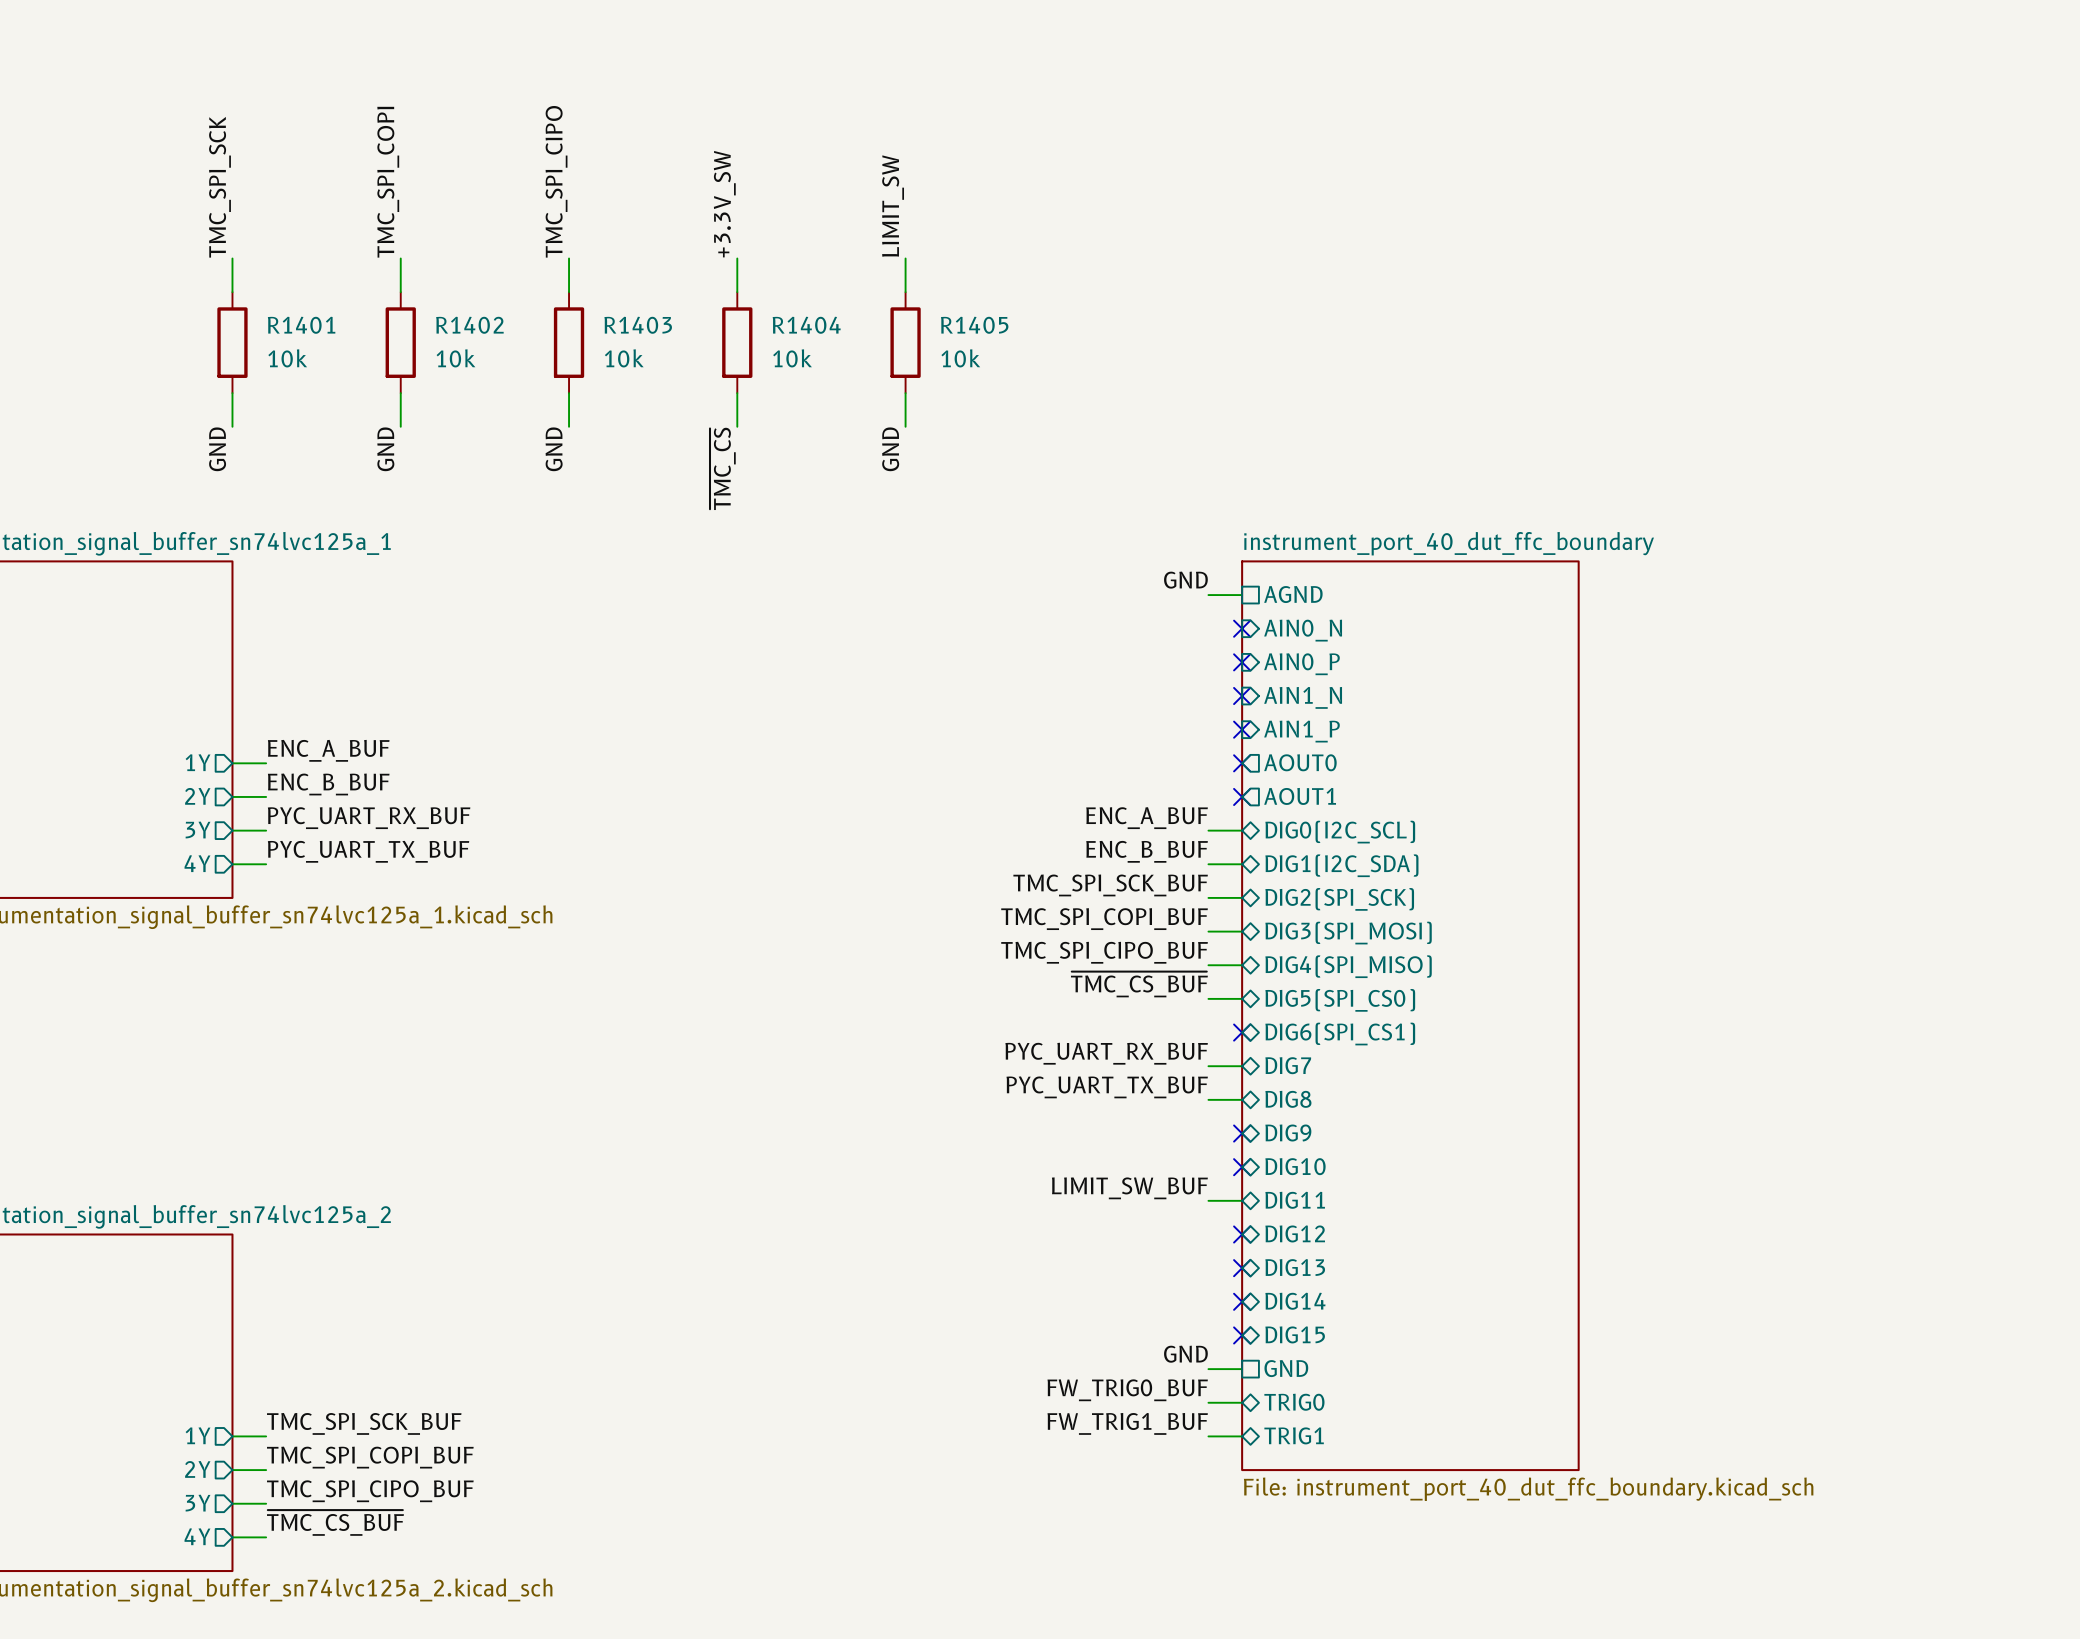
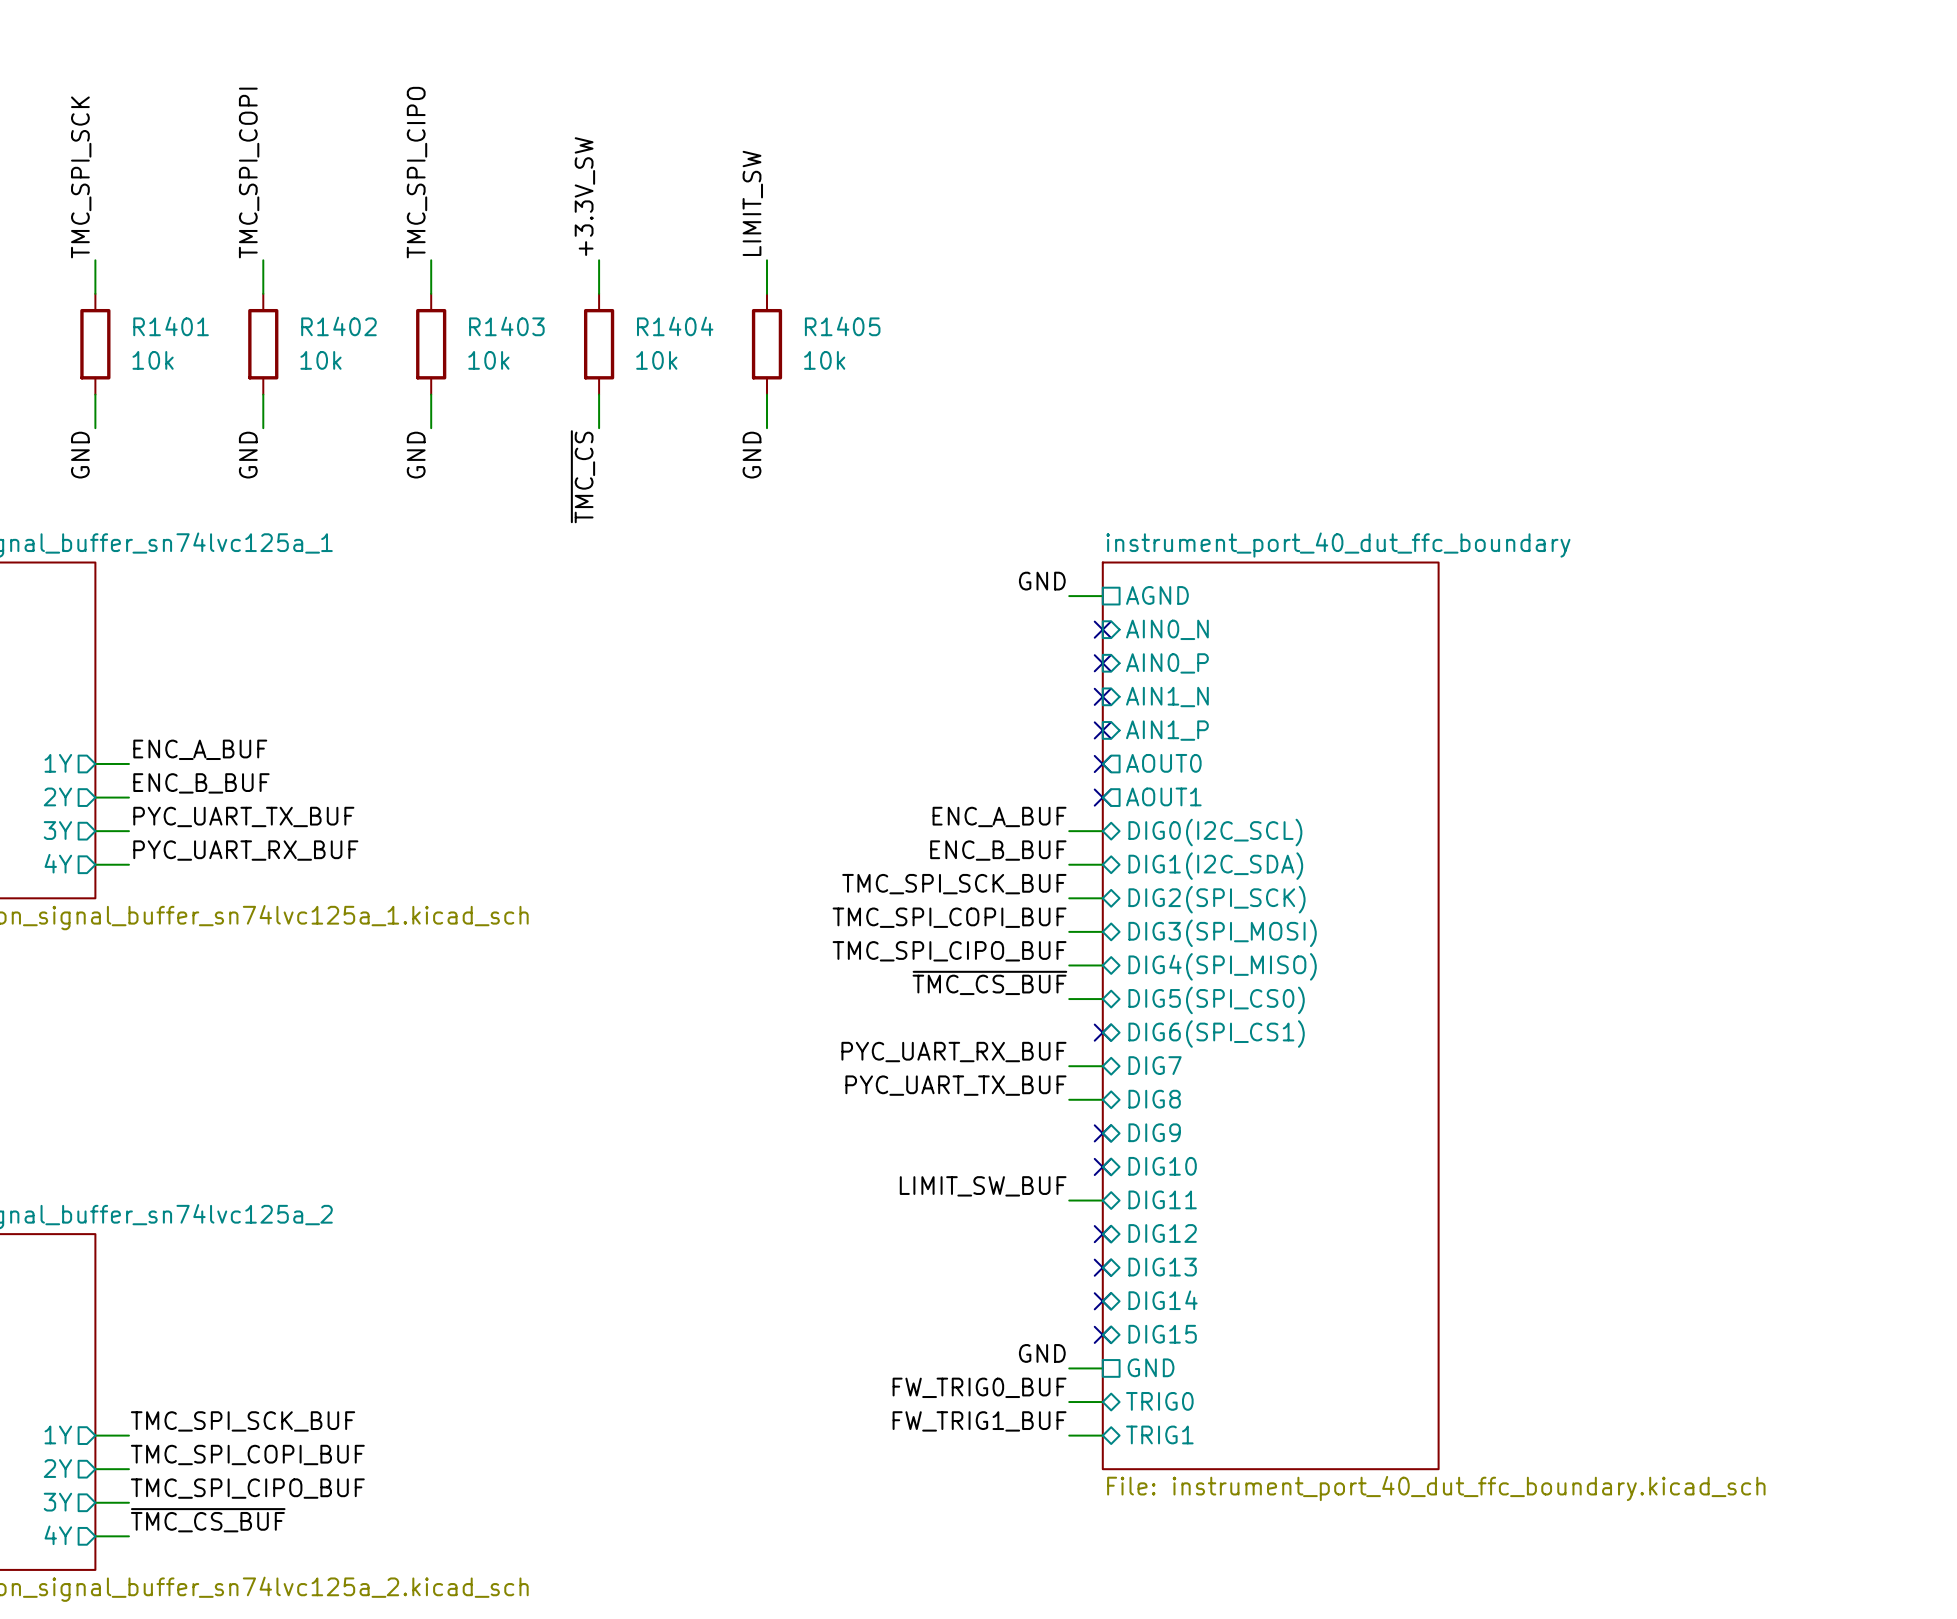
label: PYC_UART_RX_BUF (369, 818) -> PYC_UART_TX_BUF (243, 816)
label: PYC_UART_TX_BUF (368, 851) -> PYC_UART_RX_BUF (245, 850)

